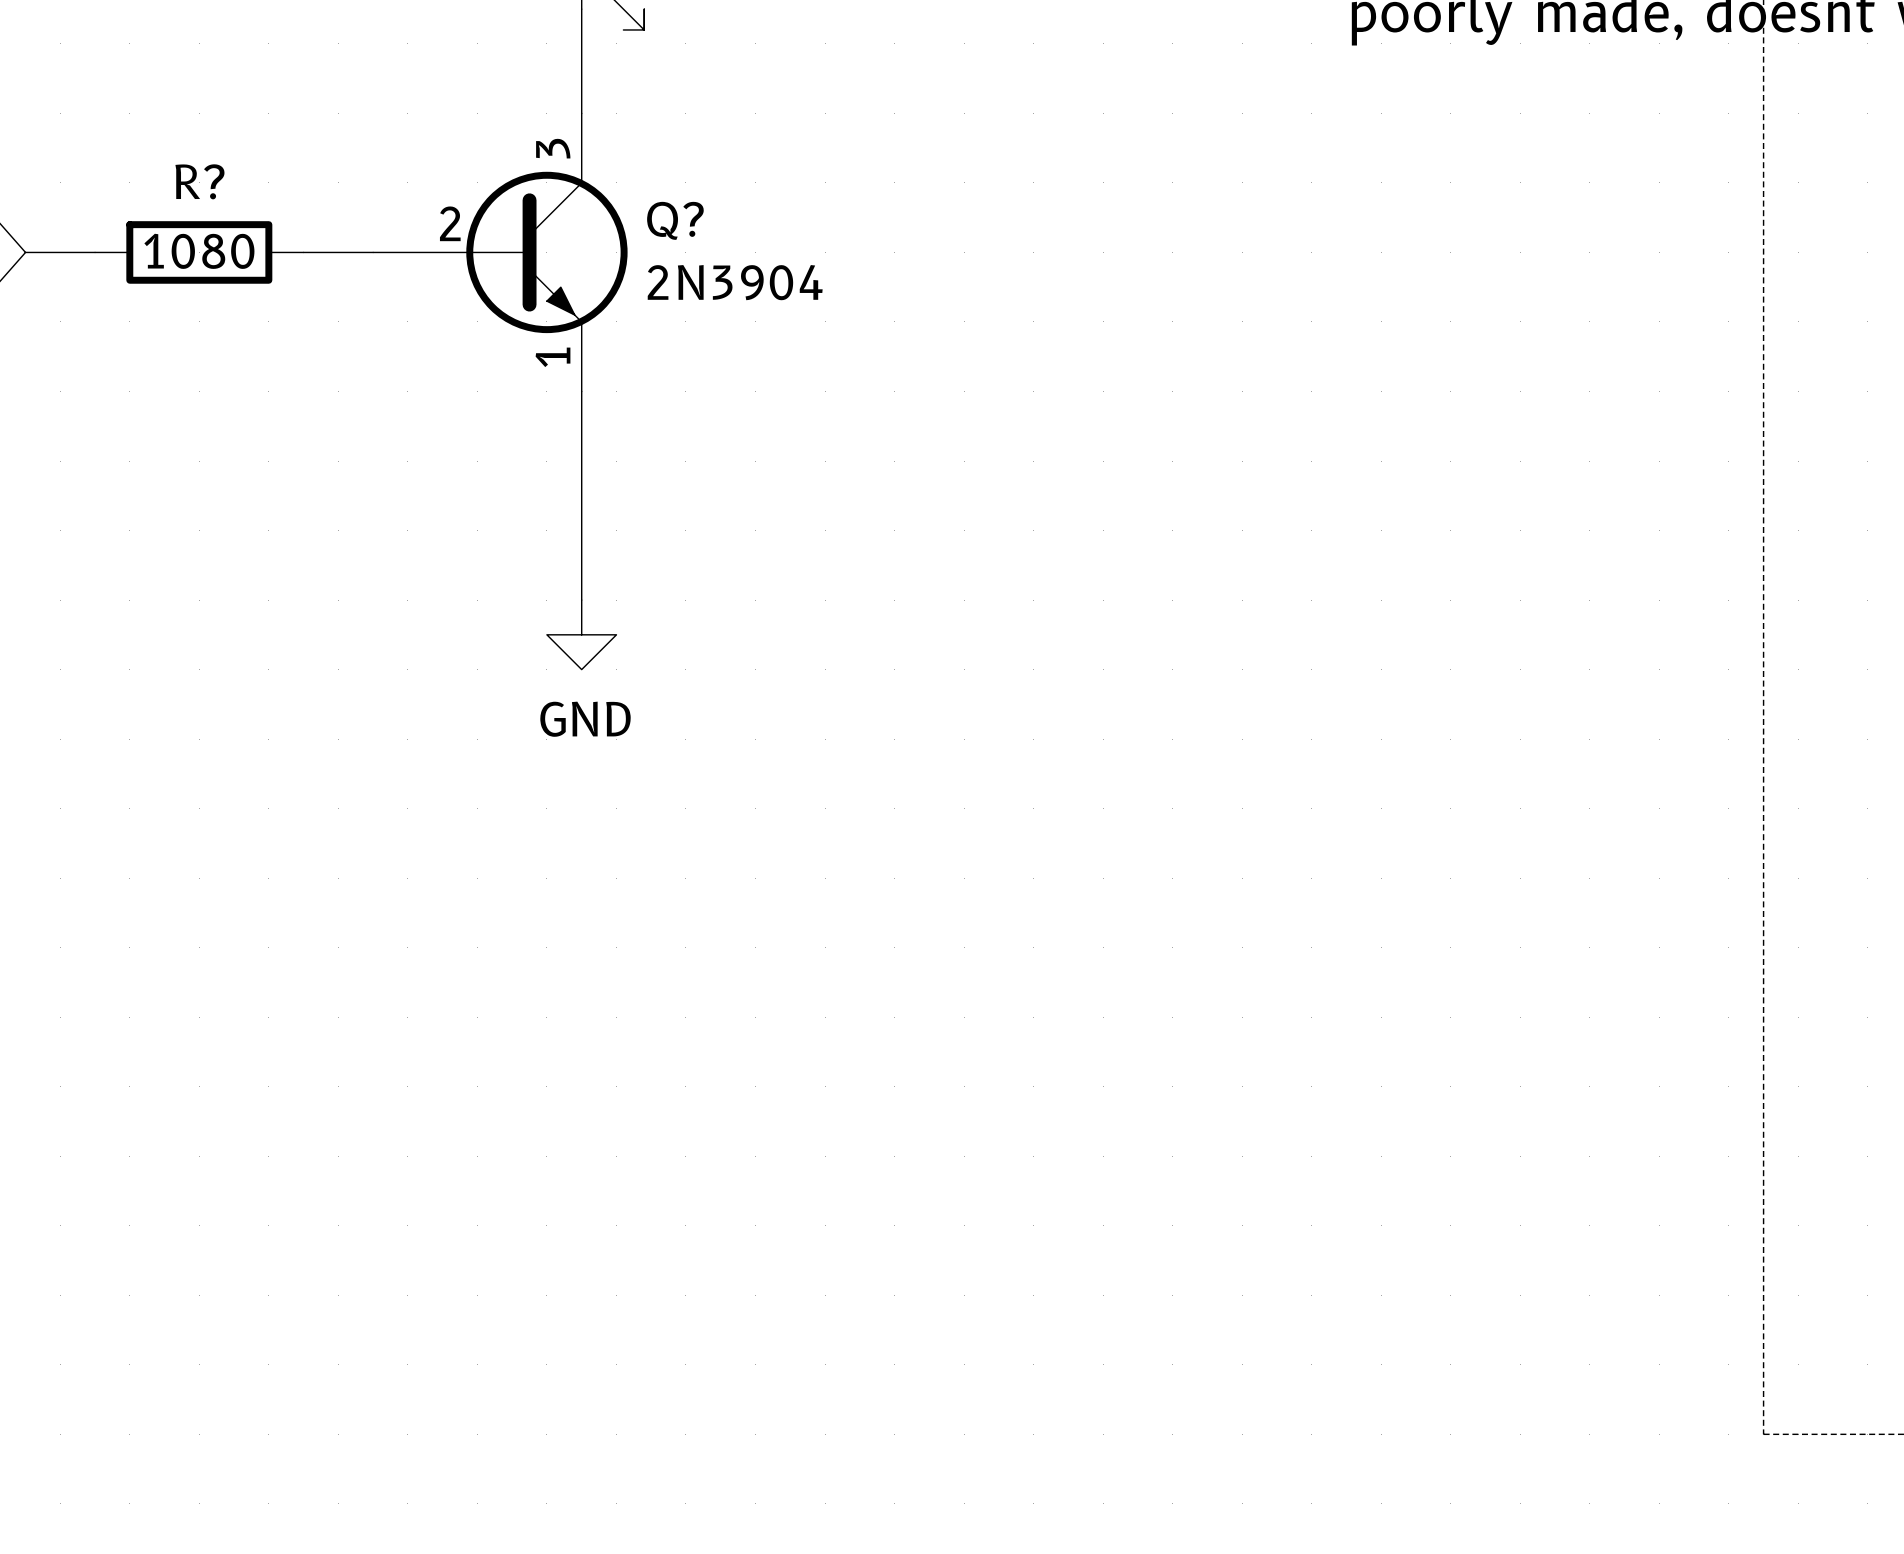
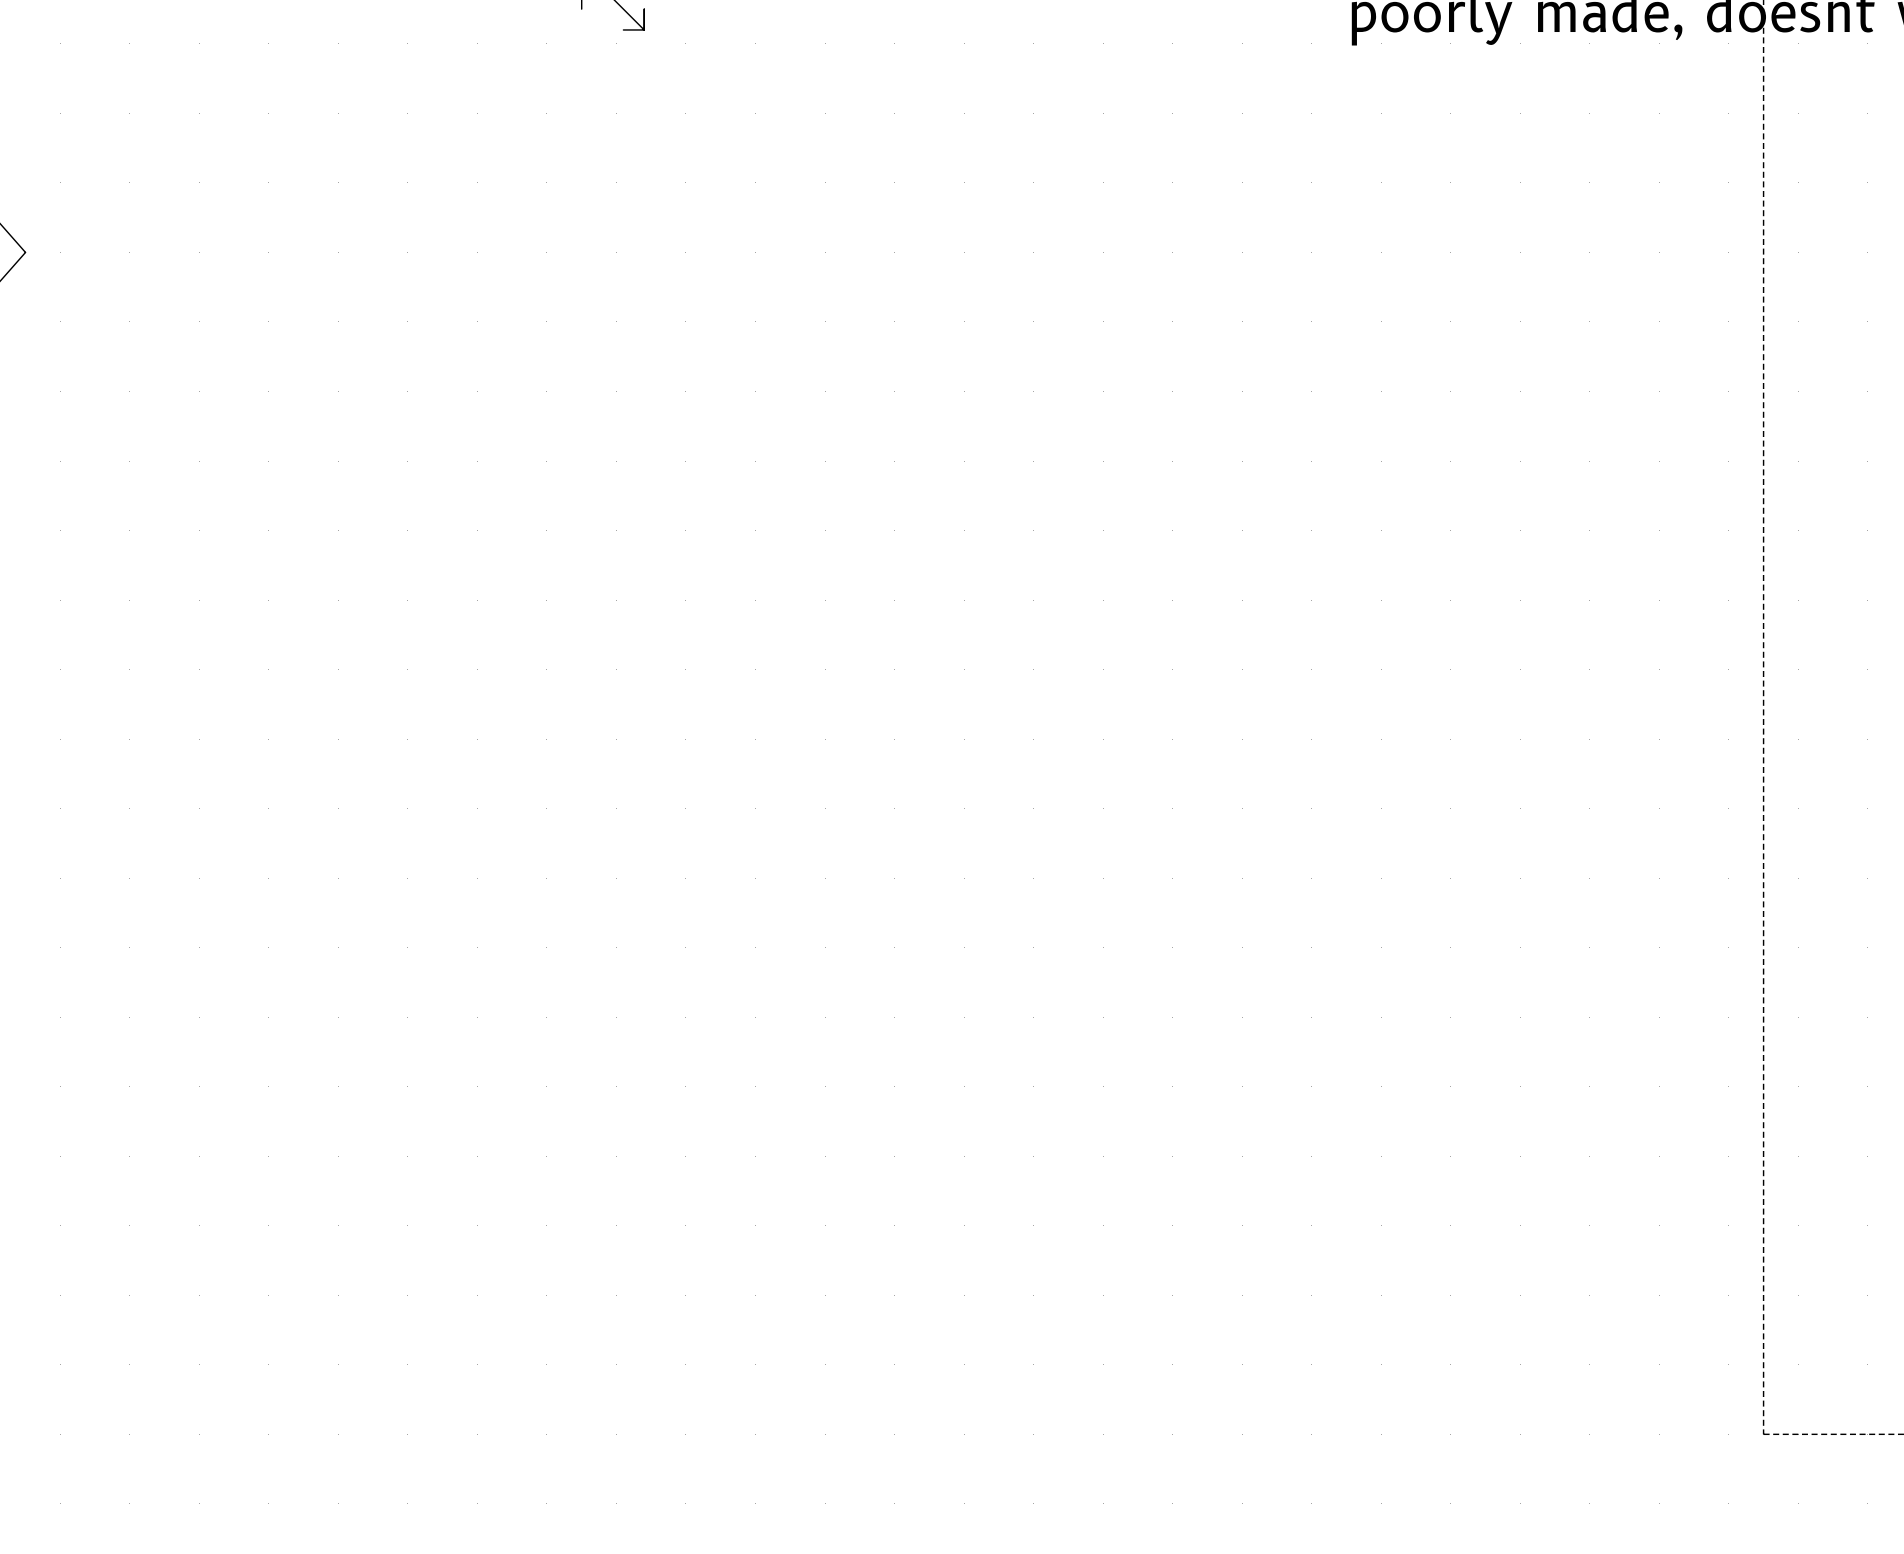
wire: (581, 9) (581, 113) -> none
wire: (25, 252) (95, 252) -> none
R?: 1080 (199, 252) -> none
wire: (303, 252) (373, 252) -> none
Q?: 2N3904 (500, 252) -> none
wire: (581, 391) (581, 600) -> none
power symbol: GND (581, 634) -> none

